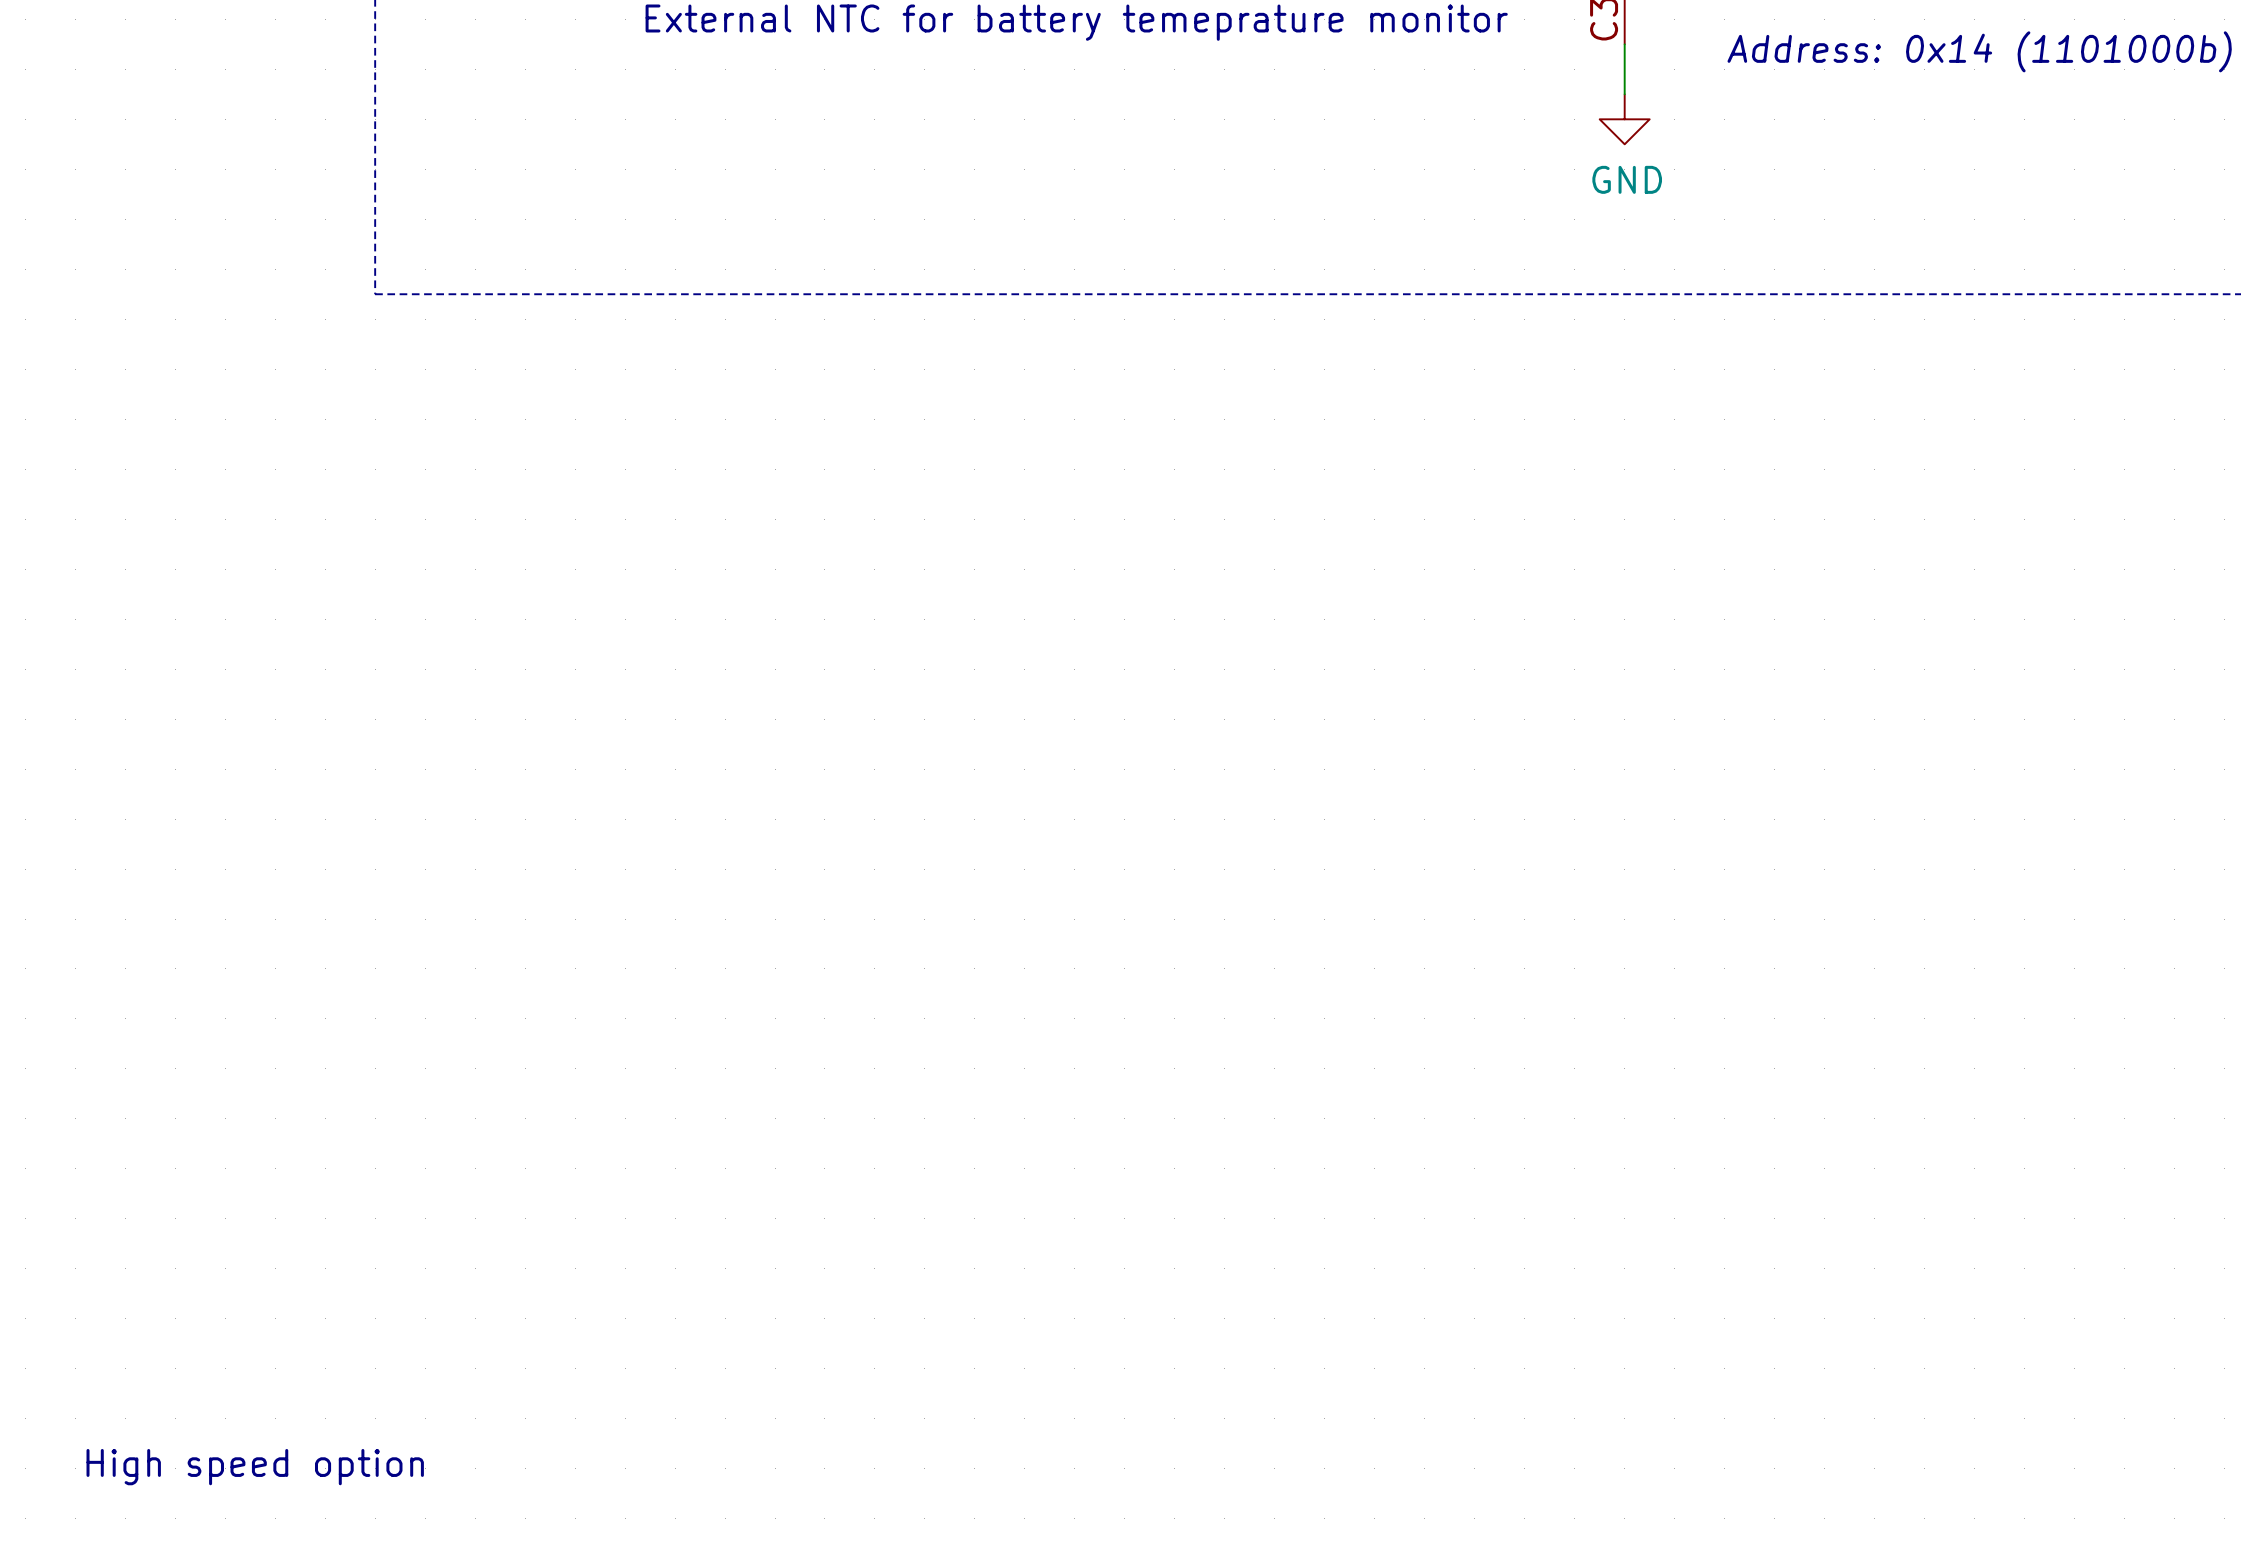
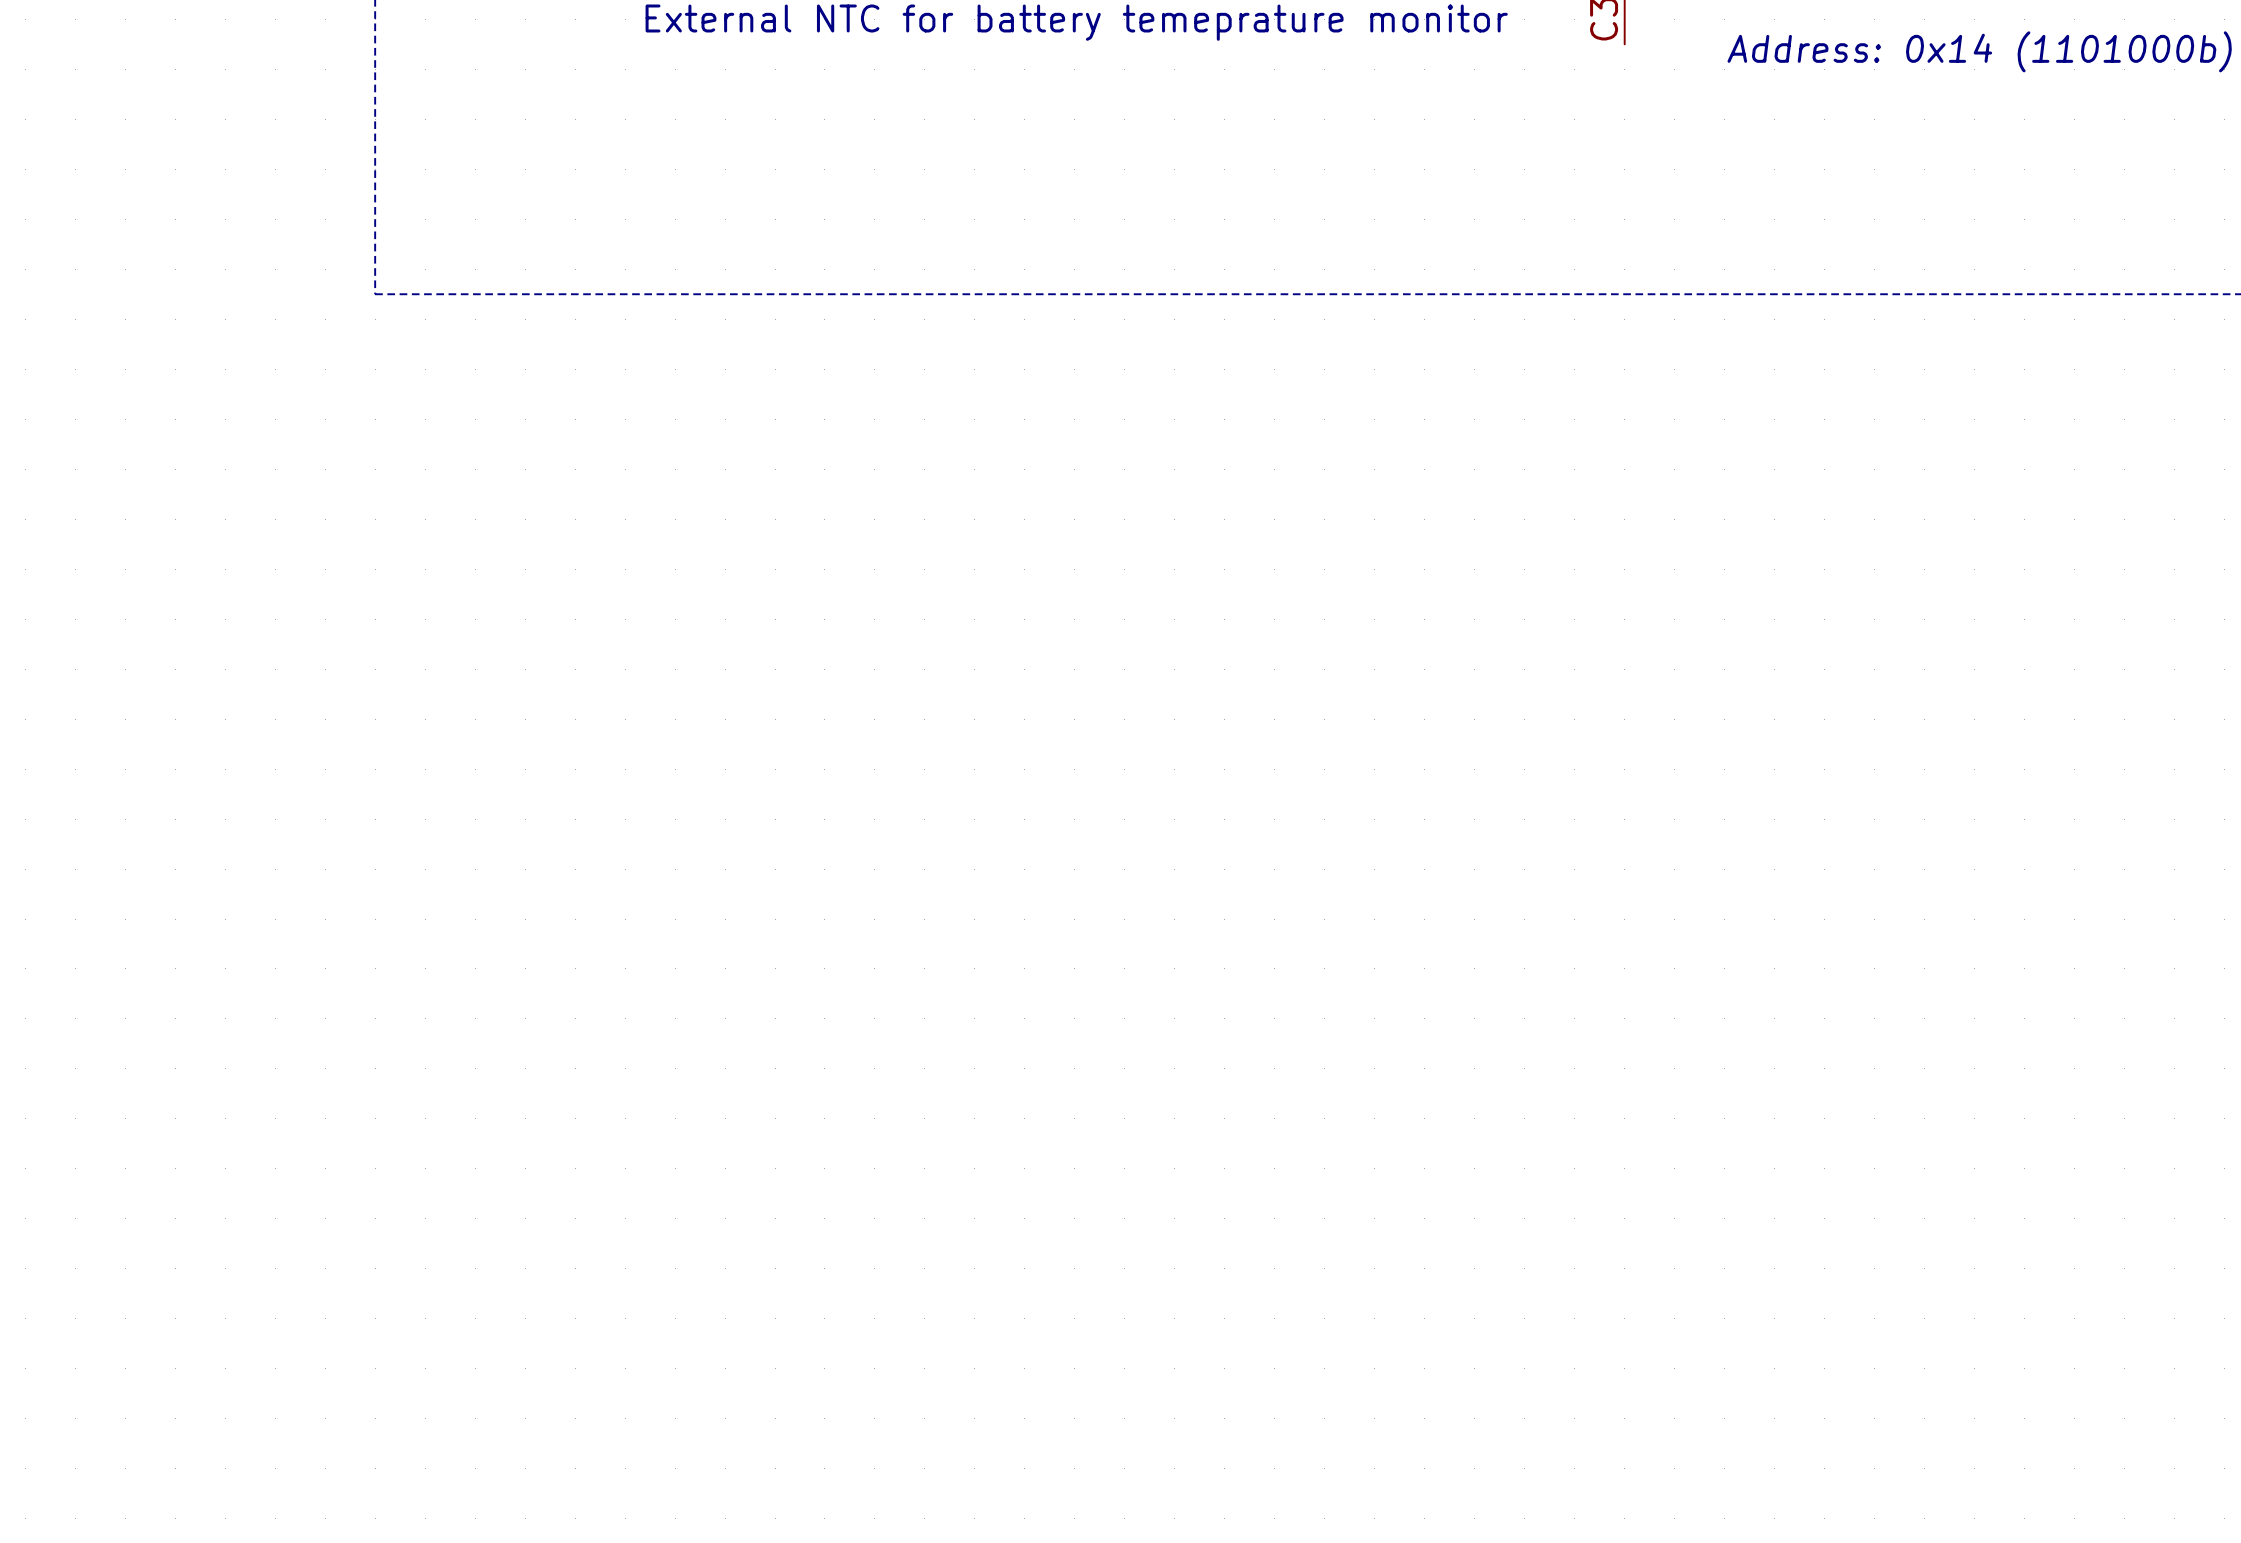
wire: (1624, 44) (1624, 94) -> none
power symbol: GND (1624, 119) -> none
text: High speed option (255, 1467) -> none

